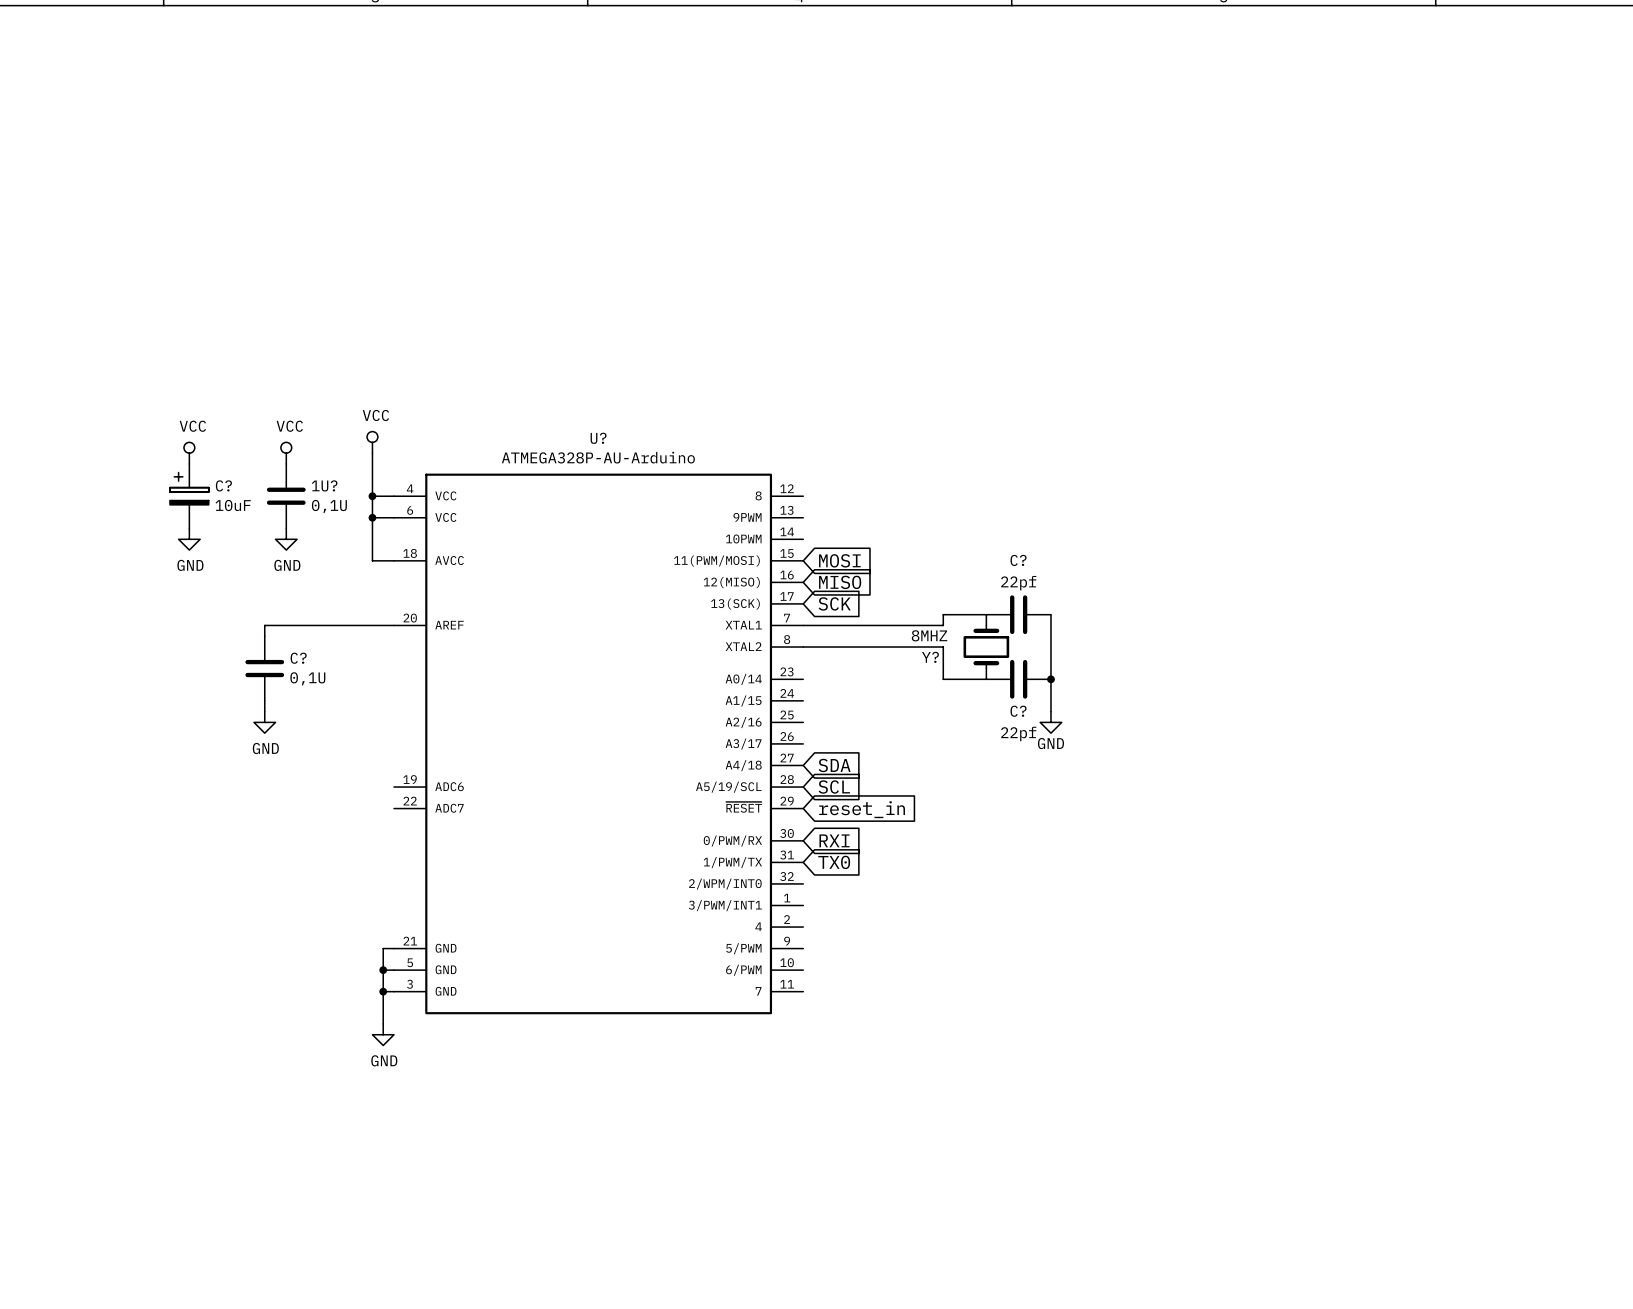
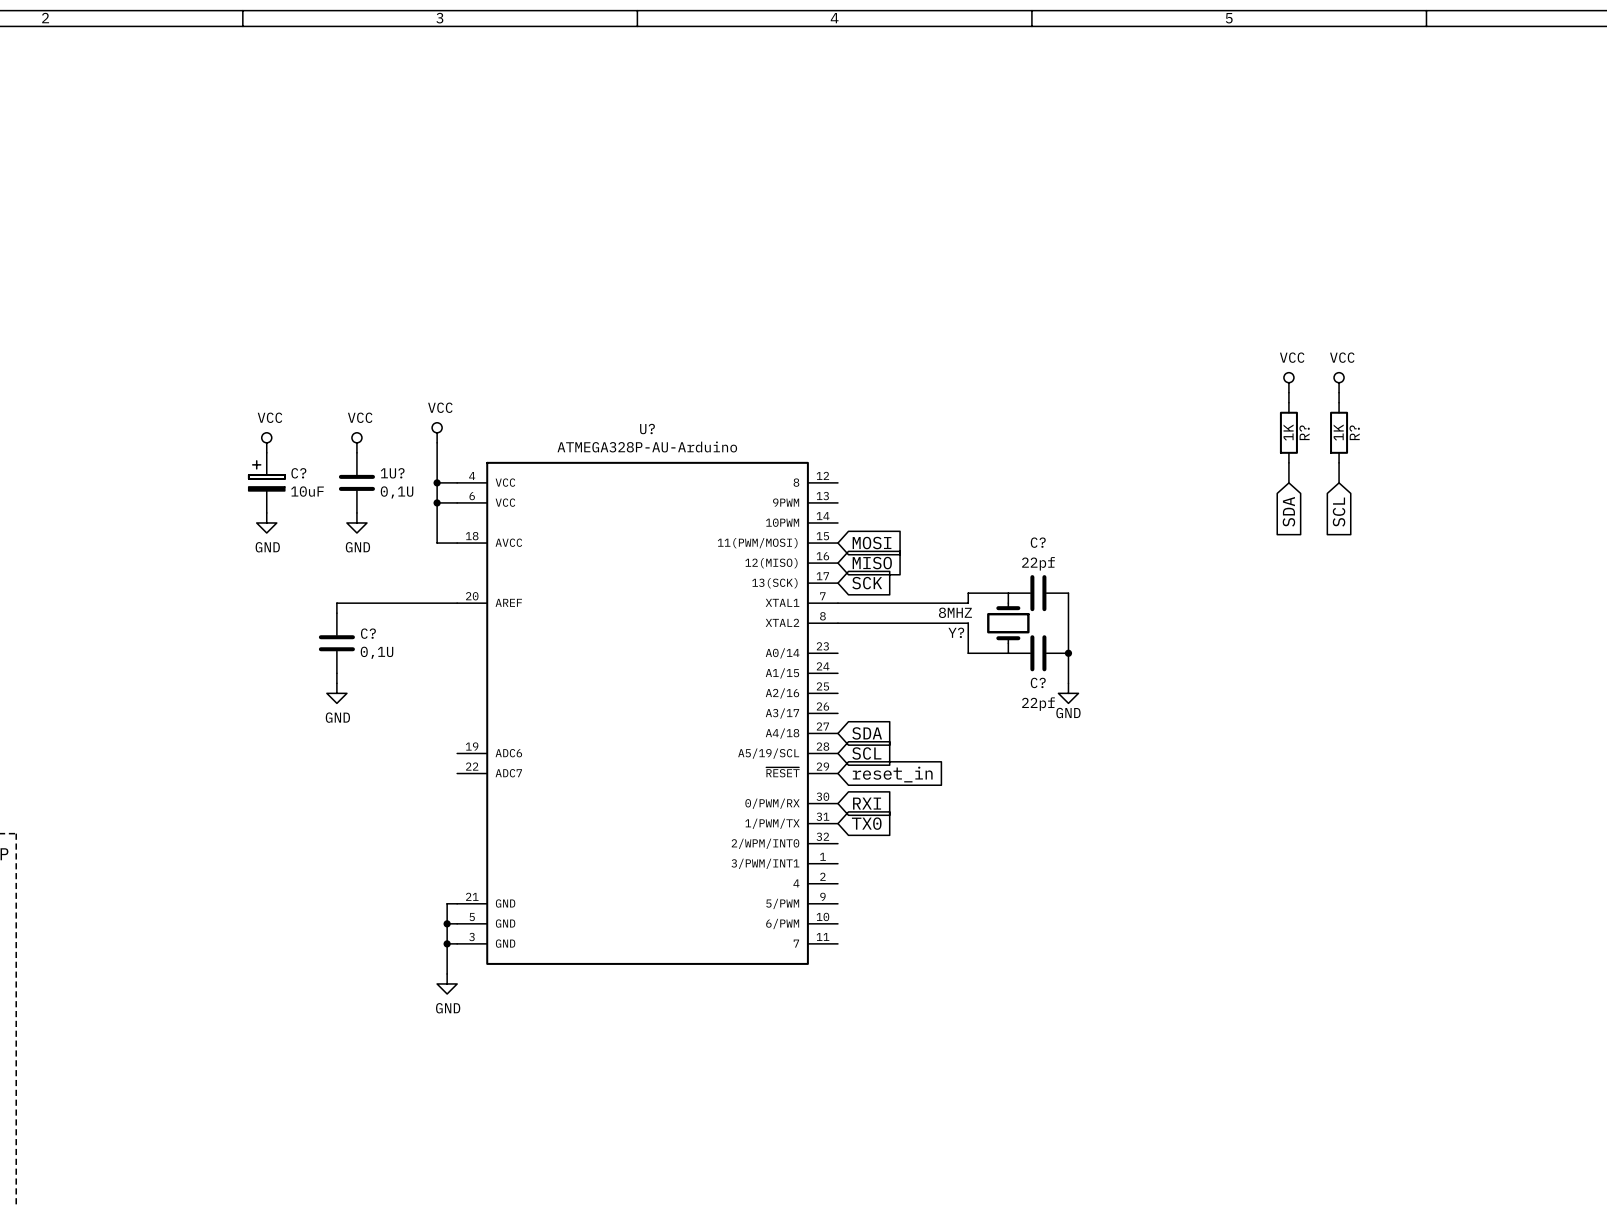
power symbol: none -> VCC (1288, 382)
power symbol: none -> VCC (1339, 382)
wire: none -> (1288, 392) (1288, 402)
wire: none -> (1339, 392) (1339, 402)
R?: none -> 1K (1288, 432)
R?: none -> 1K (1339, 432)
wire: none -> (1288, 462) (1288, 482)
wire: none -> (1339, 462) (1339, 482)
global label: none -> SDA (1288, 511)
global label: none -> SCL (1339, 512)

